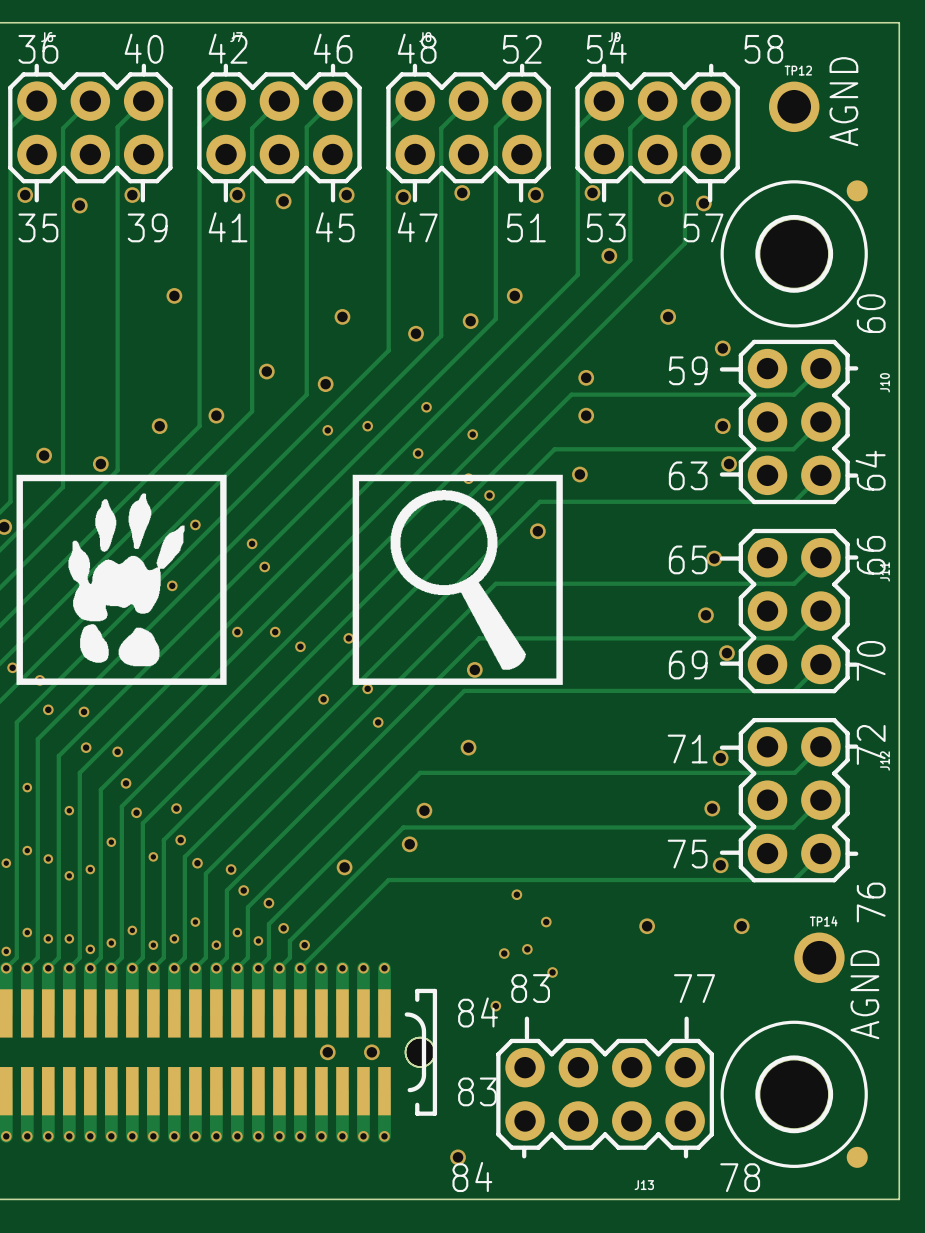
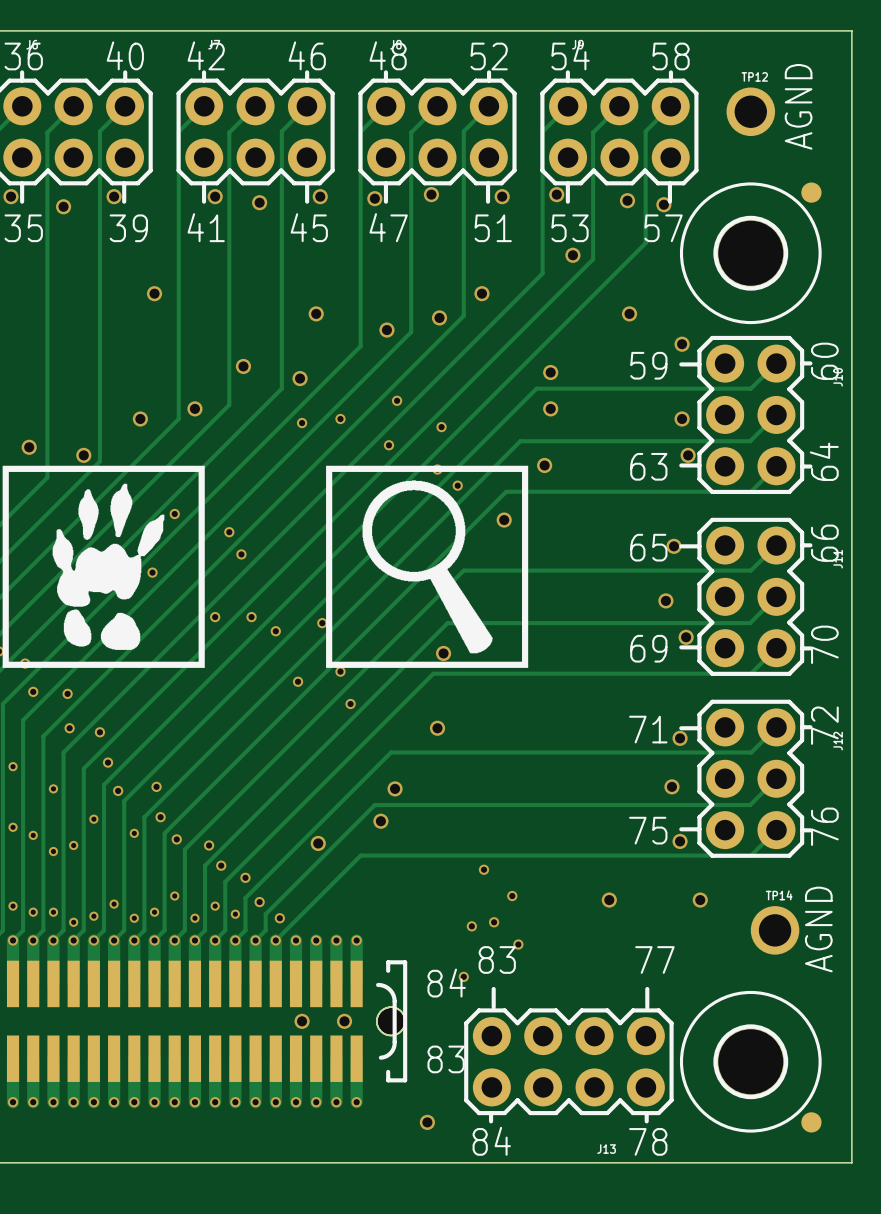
text position: 58 (763, 49) -> 58 (671, 56)
text position: 60 (871, 313) -> 60 (824, 361)
text position: 76 (871, 902) -> 76 (824, 826)
text position: AGND (864, 994) -> AGND (818, 929)
text position: 84 (472, 1177) -> 84 (491, 1141)
text position: 78 (740, 1177) -> 78 (648, 1141)

